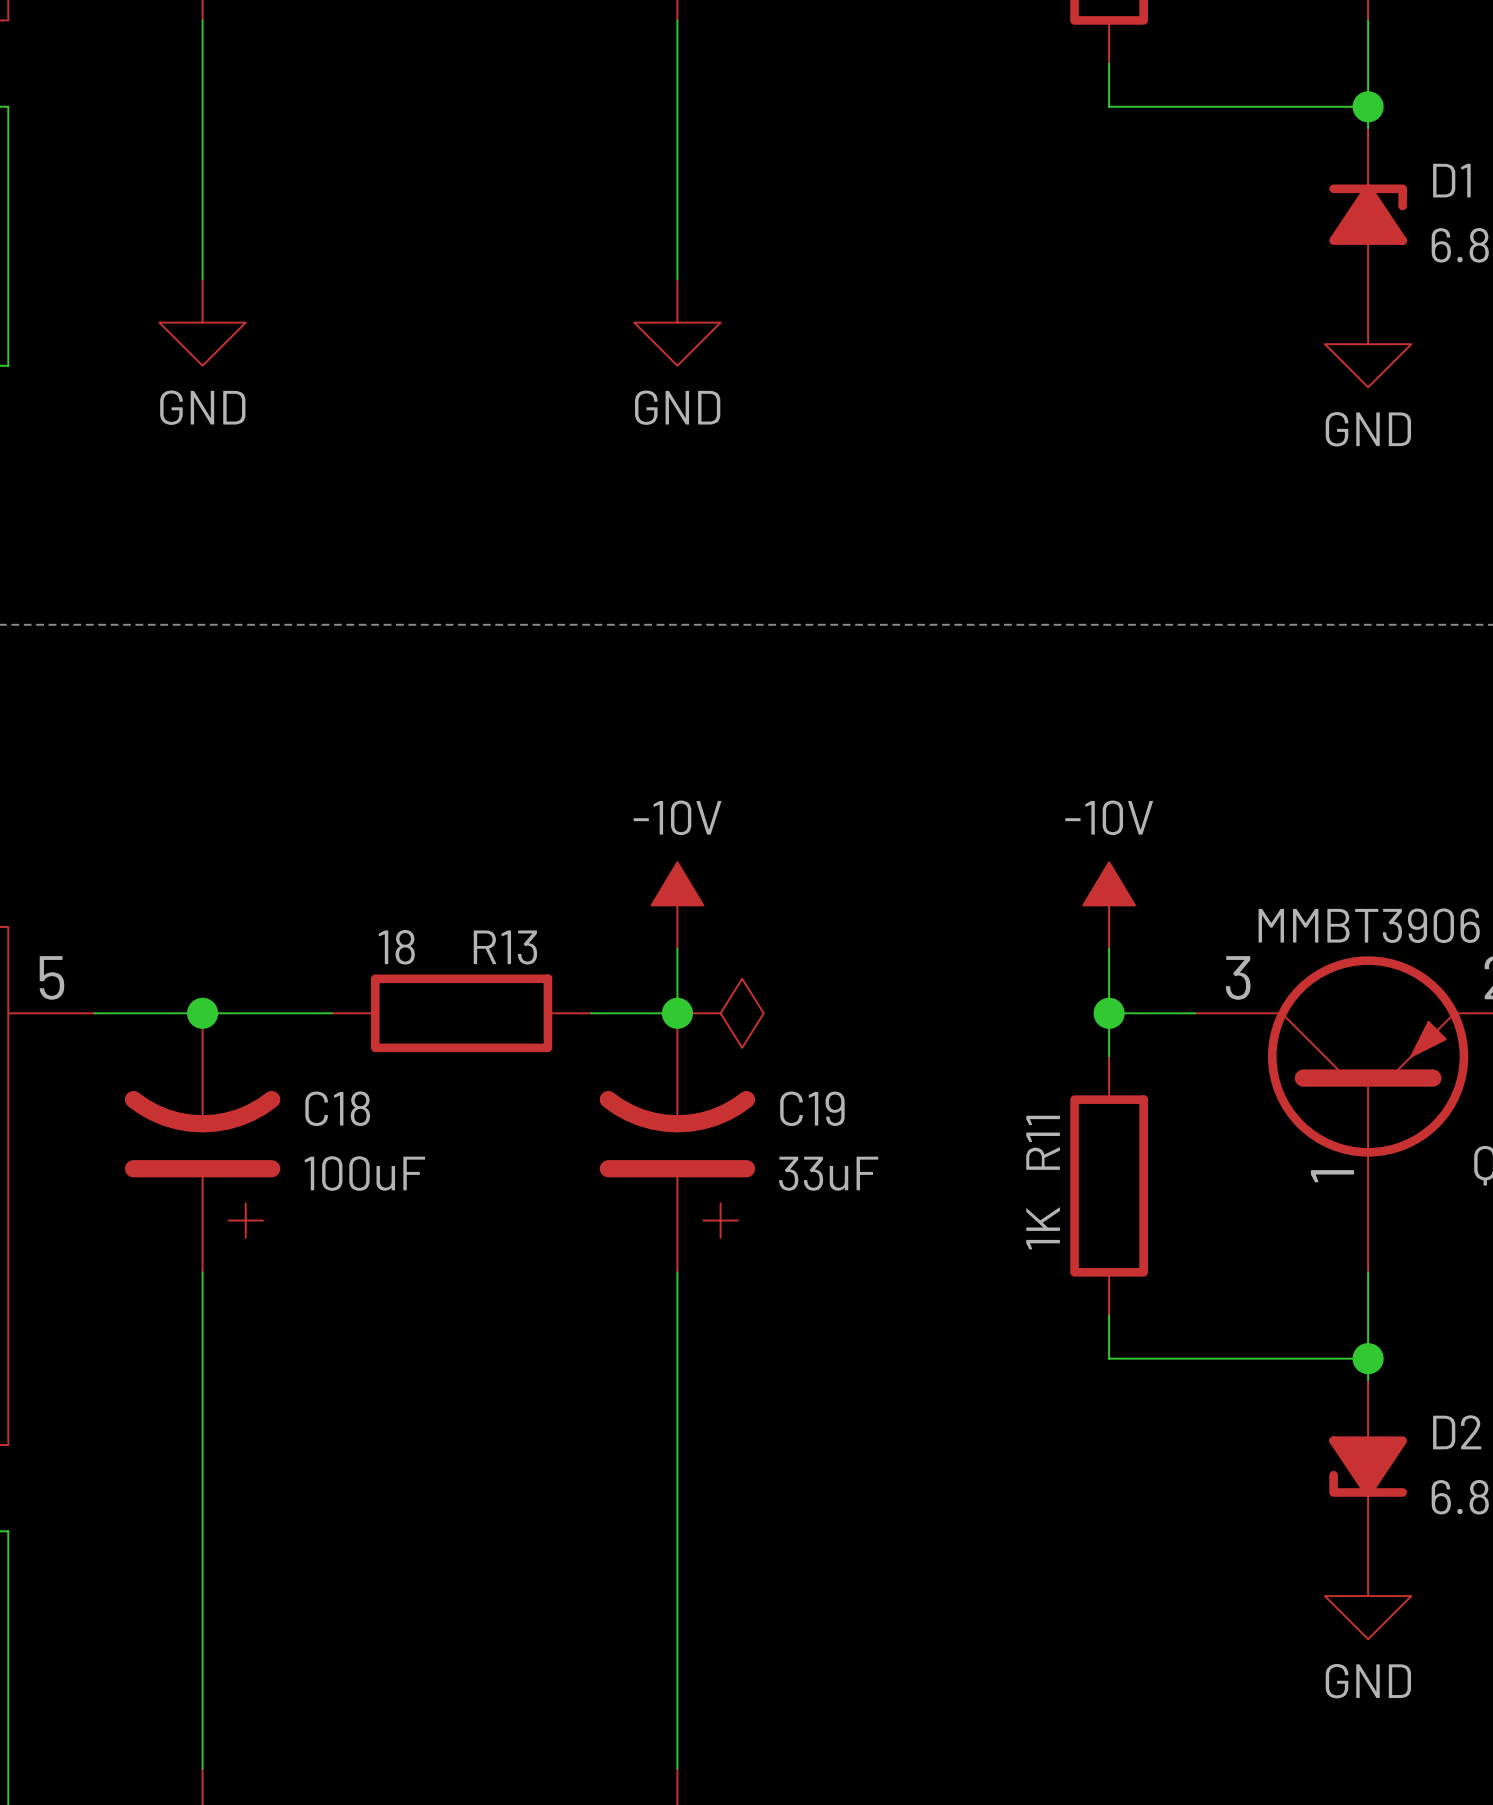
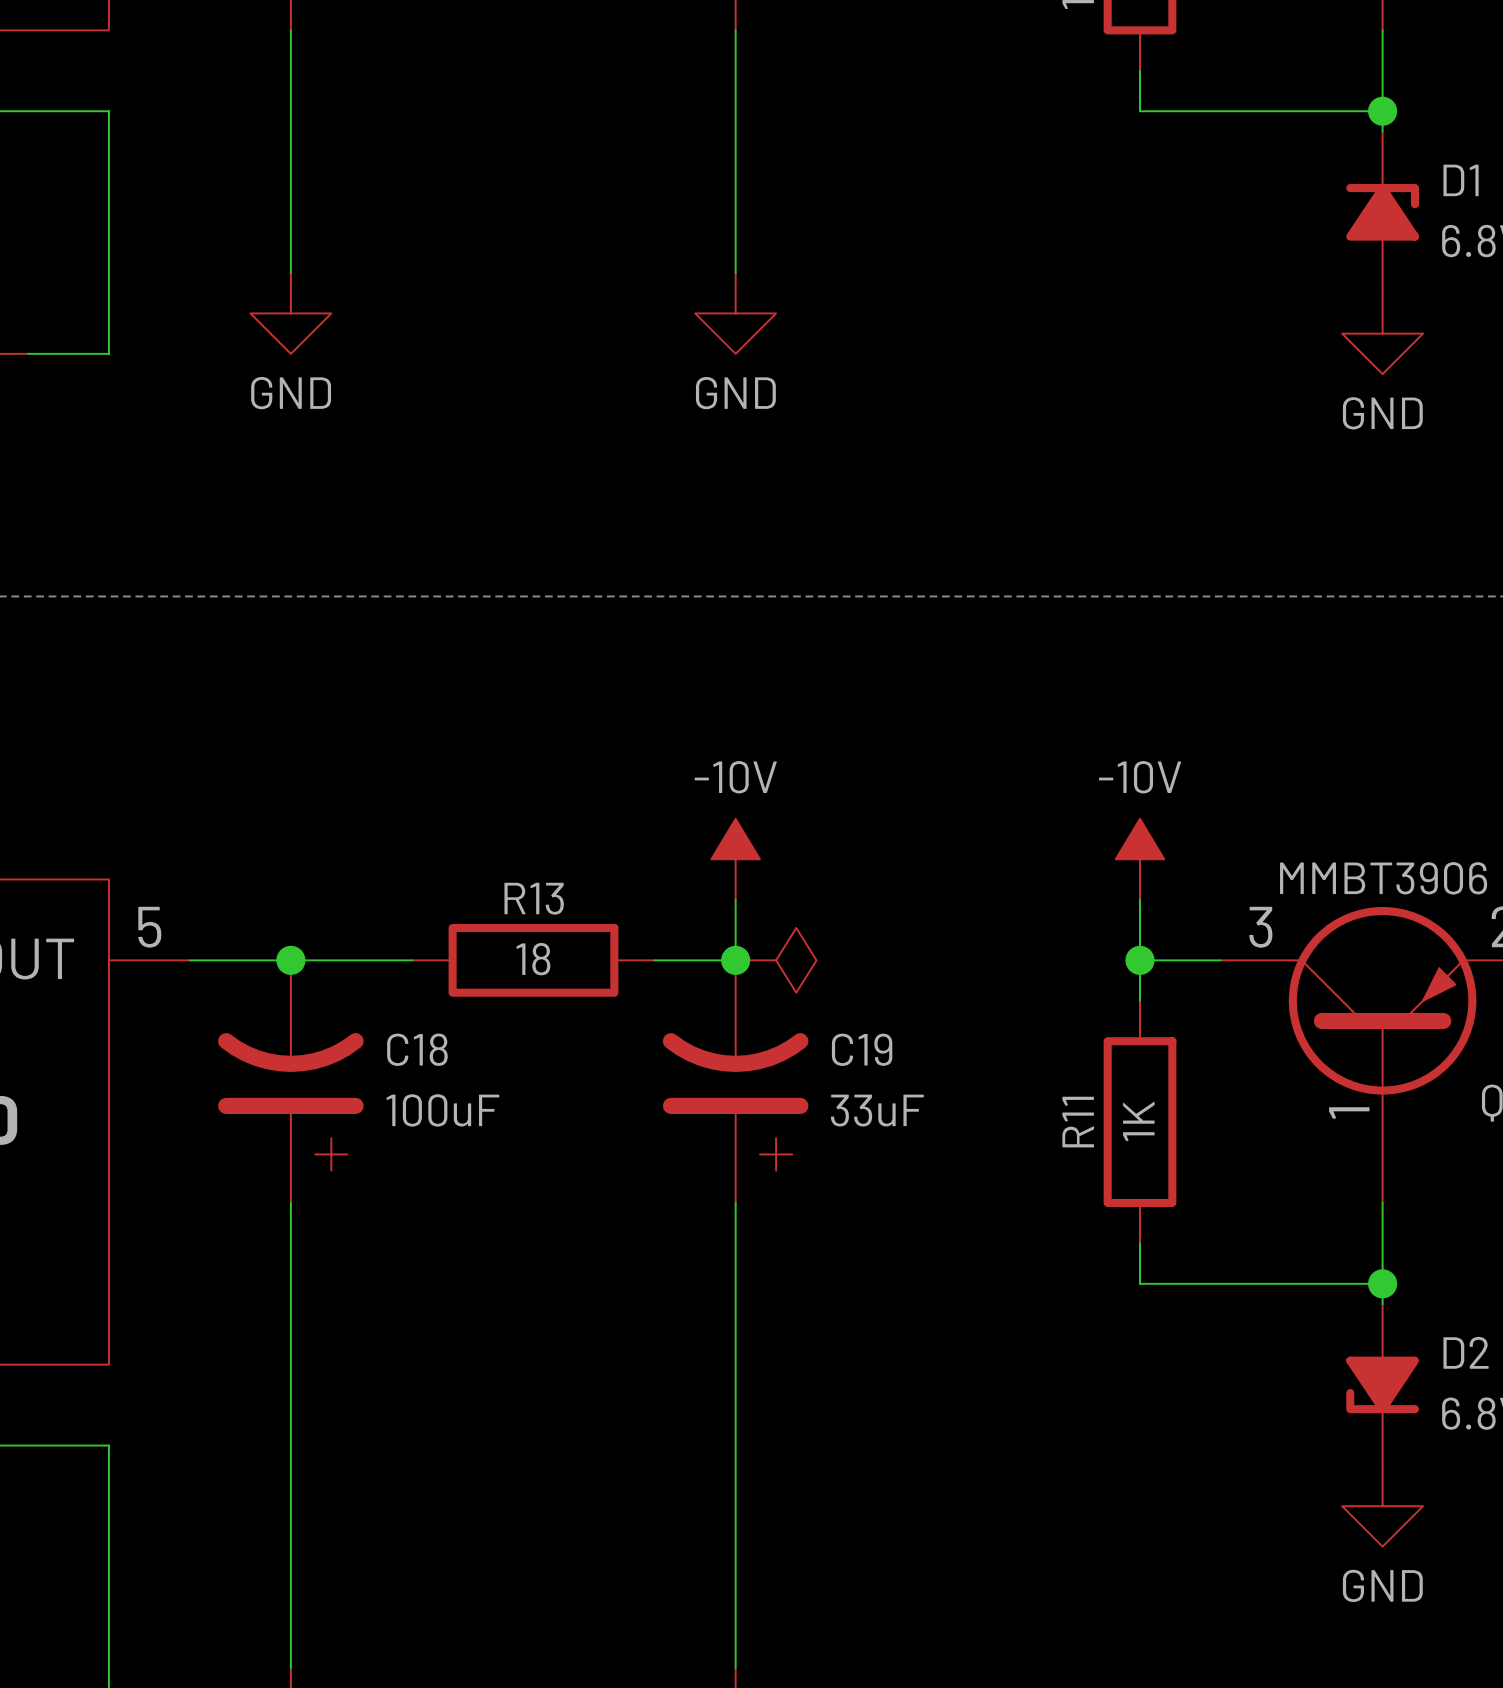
R13 value position: 18 (396, 947) -> 18 (533, 959)
R13 name position: R13 (505, 947) -> R13 (534, 898)
R11 name position: R11 (1043, 1142) -> R11 (1078, 1122)
R11 value position: 1K (1043, 1228) -> 1K (1138, 1121)

